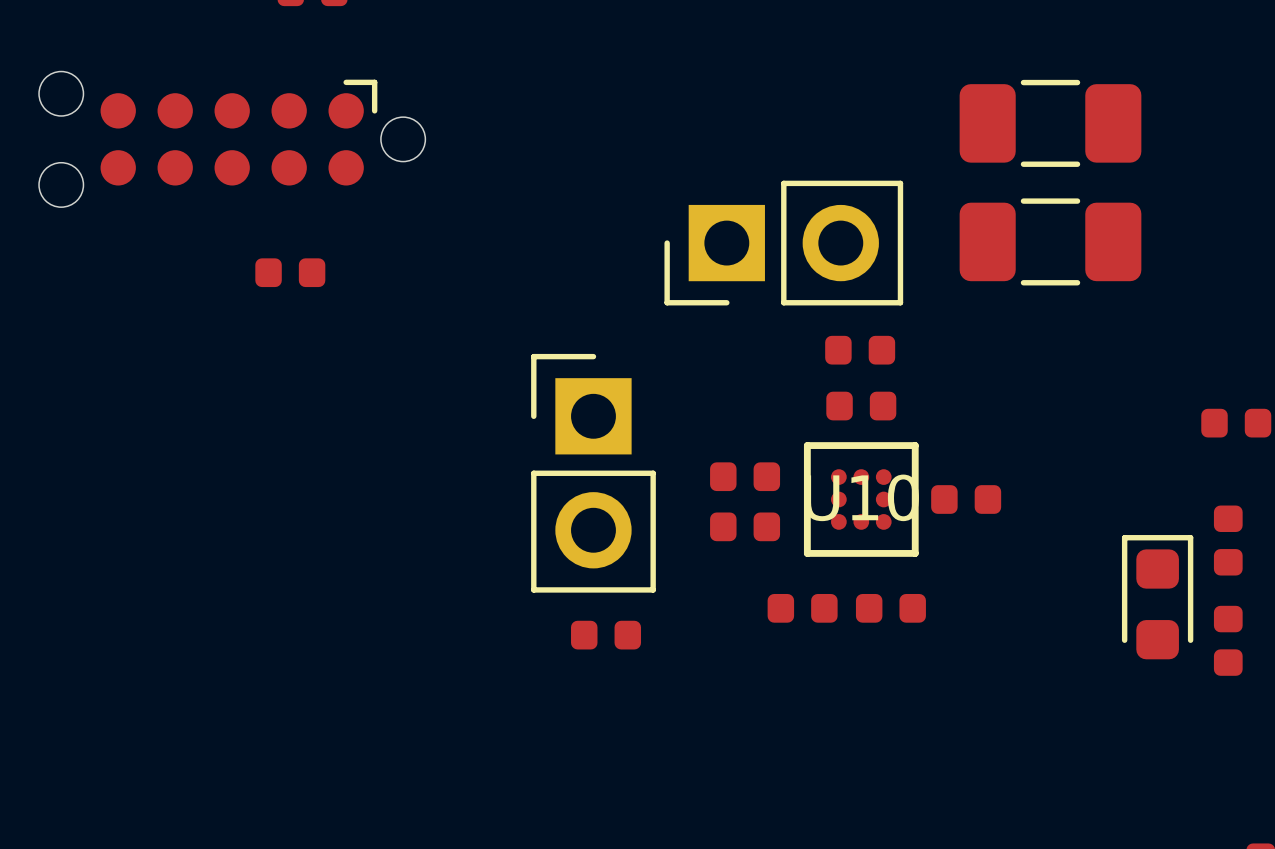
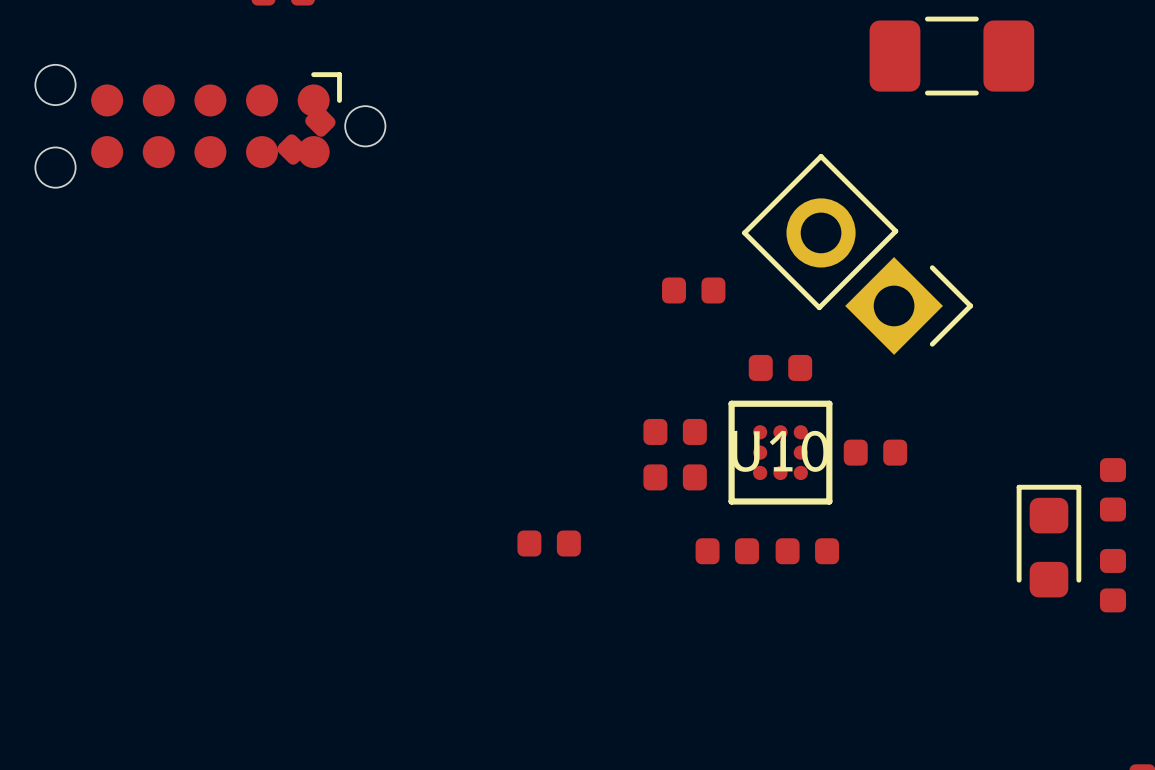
part position: (1050, 123) -> (951, 56)
part: none -> (306, 135)
part: (1050, 241) -> none
part: (783, 243) -> none
part: (290, 272) -> none
part: none -> (857, 254)
part position: (860, 350) -> (693, 290)
part: (1236, 423) -> none
part: (593, 473) -> none
part position: (606, 635) -> (549, 543)

